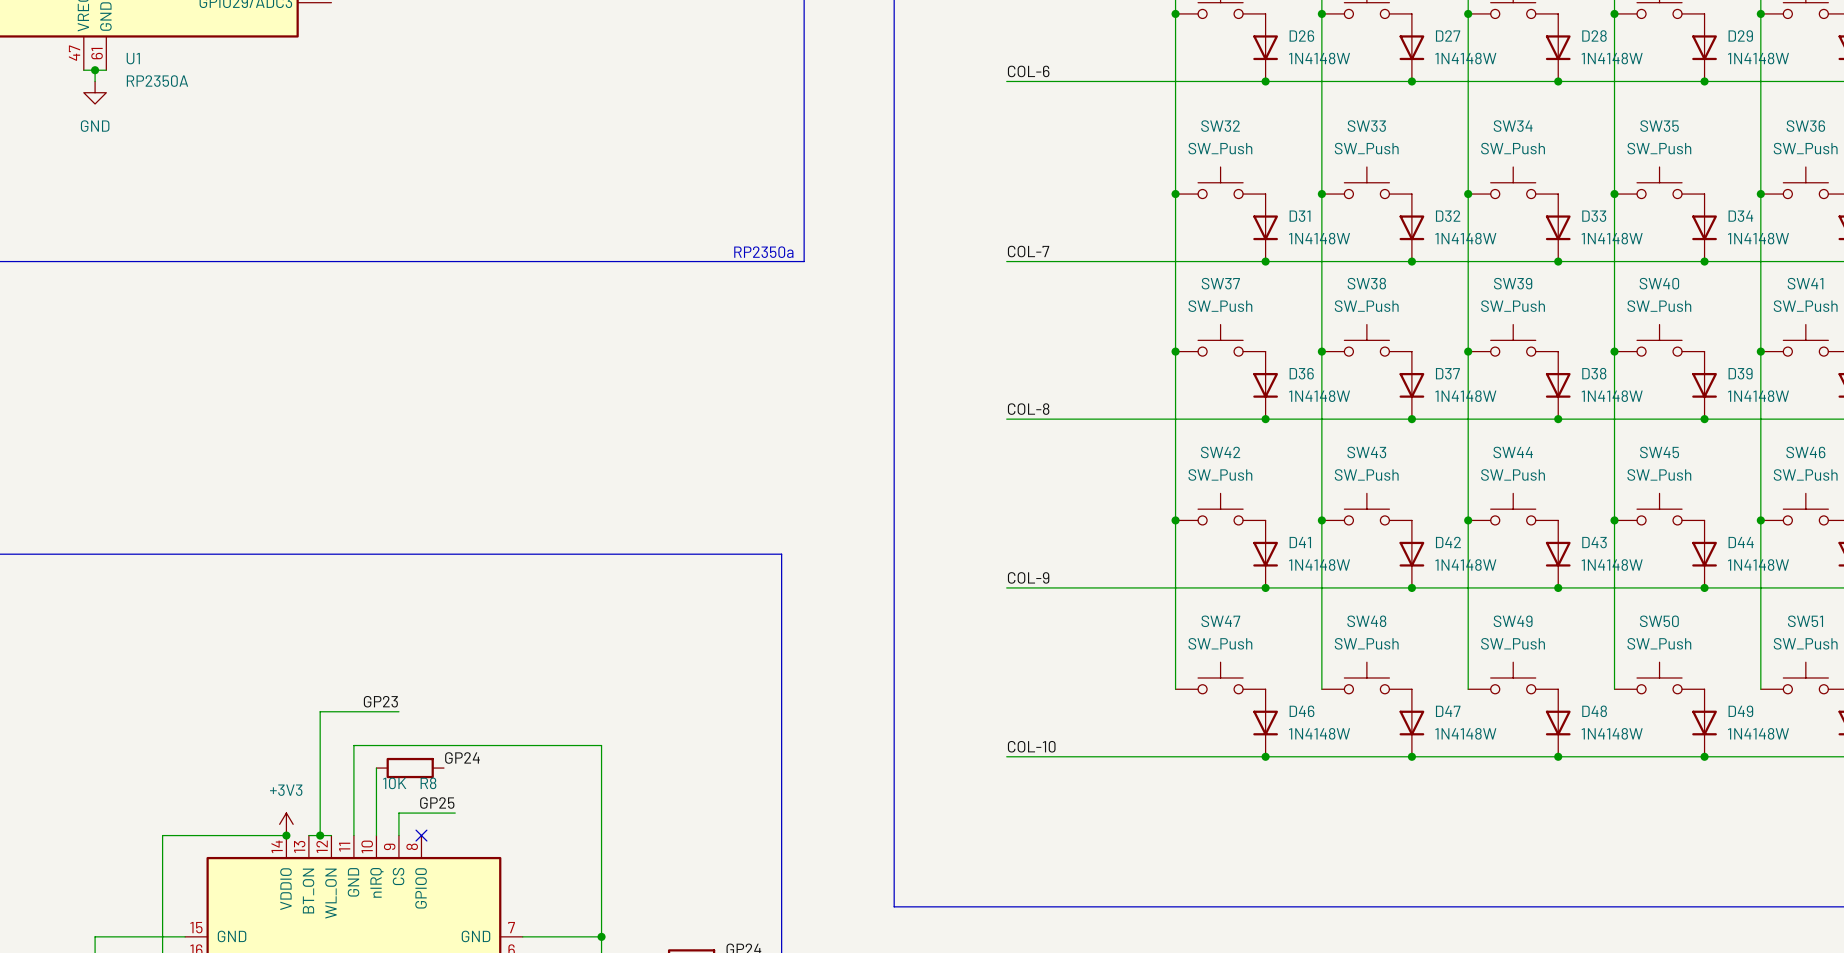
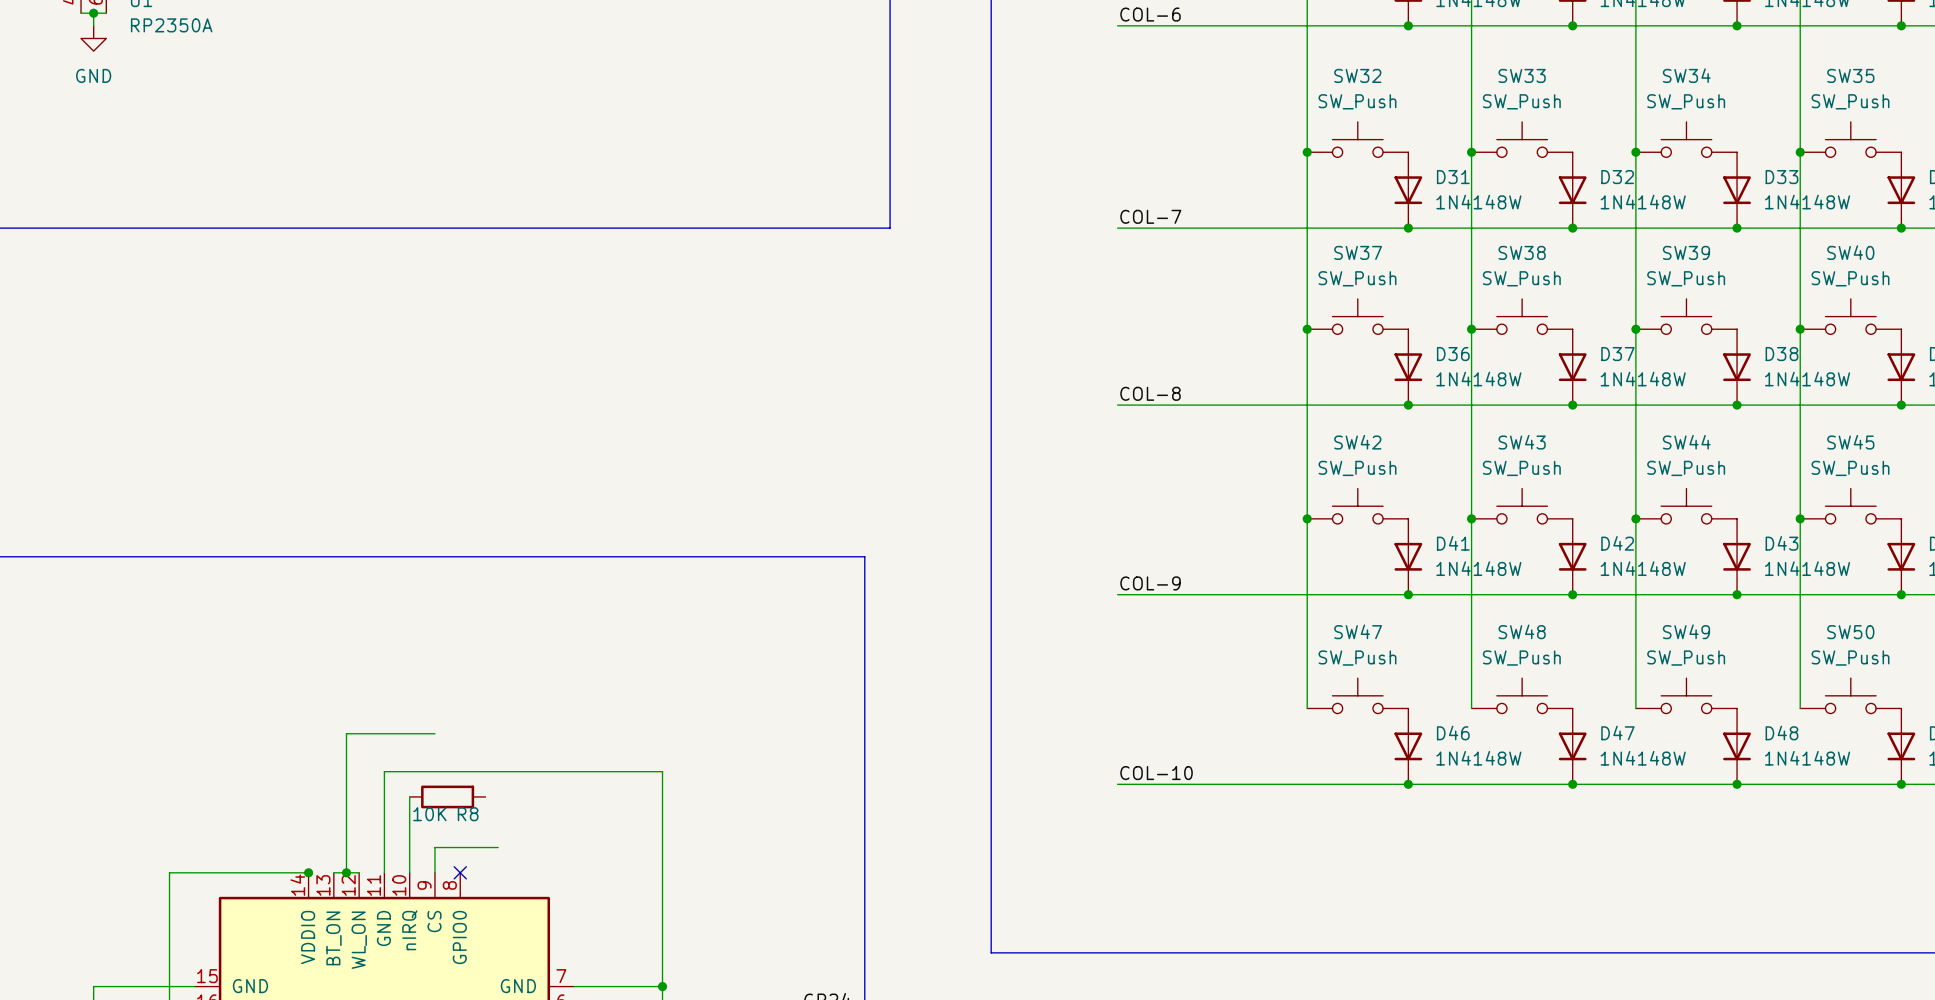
text: RP2350a (763, 252) -> none
label: GP23 (380, 701) -> none
label: GP24 (462, 757) -> none
label: GP25 (437, 803) -> none
power symbol: +3V3 (286, 824) -> none

